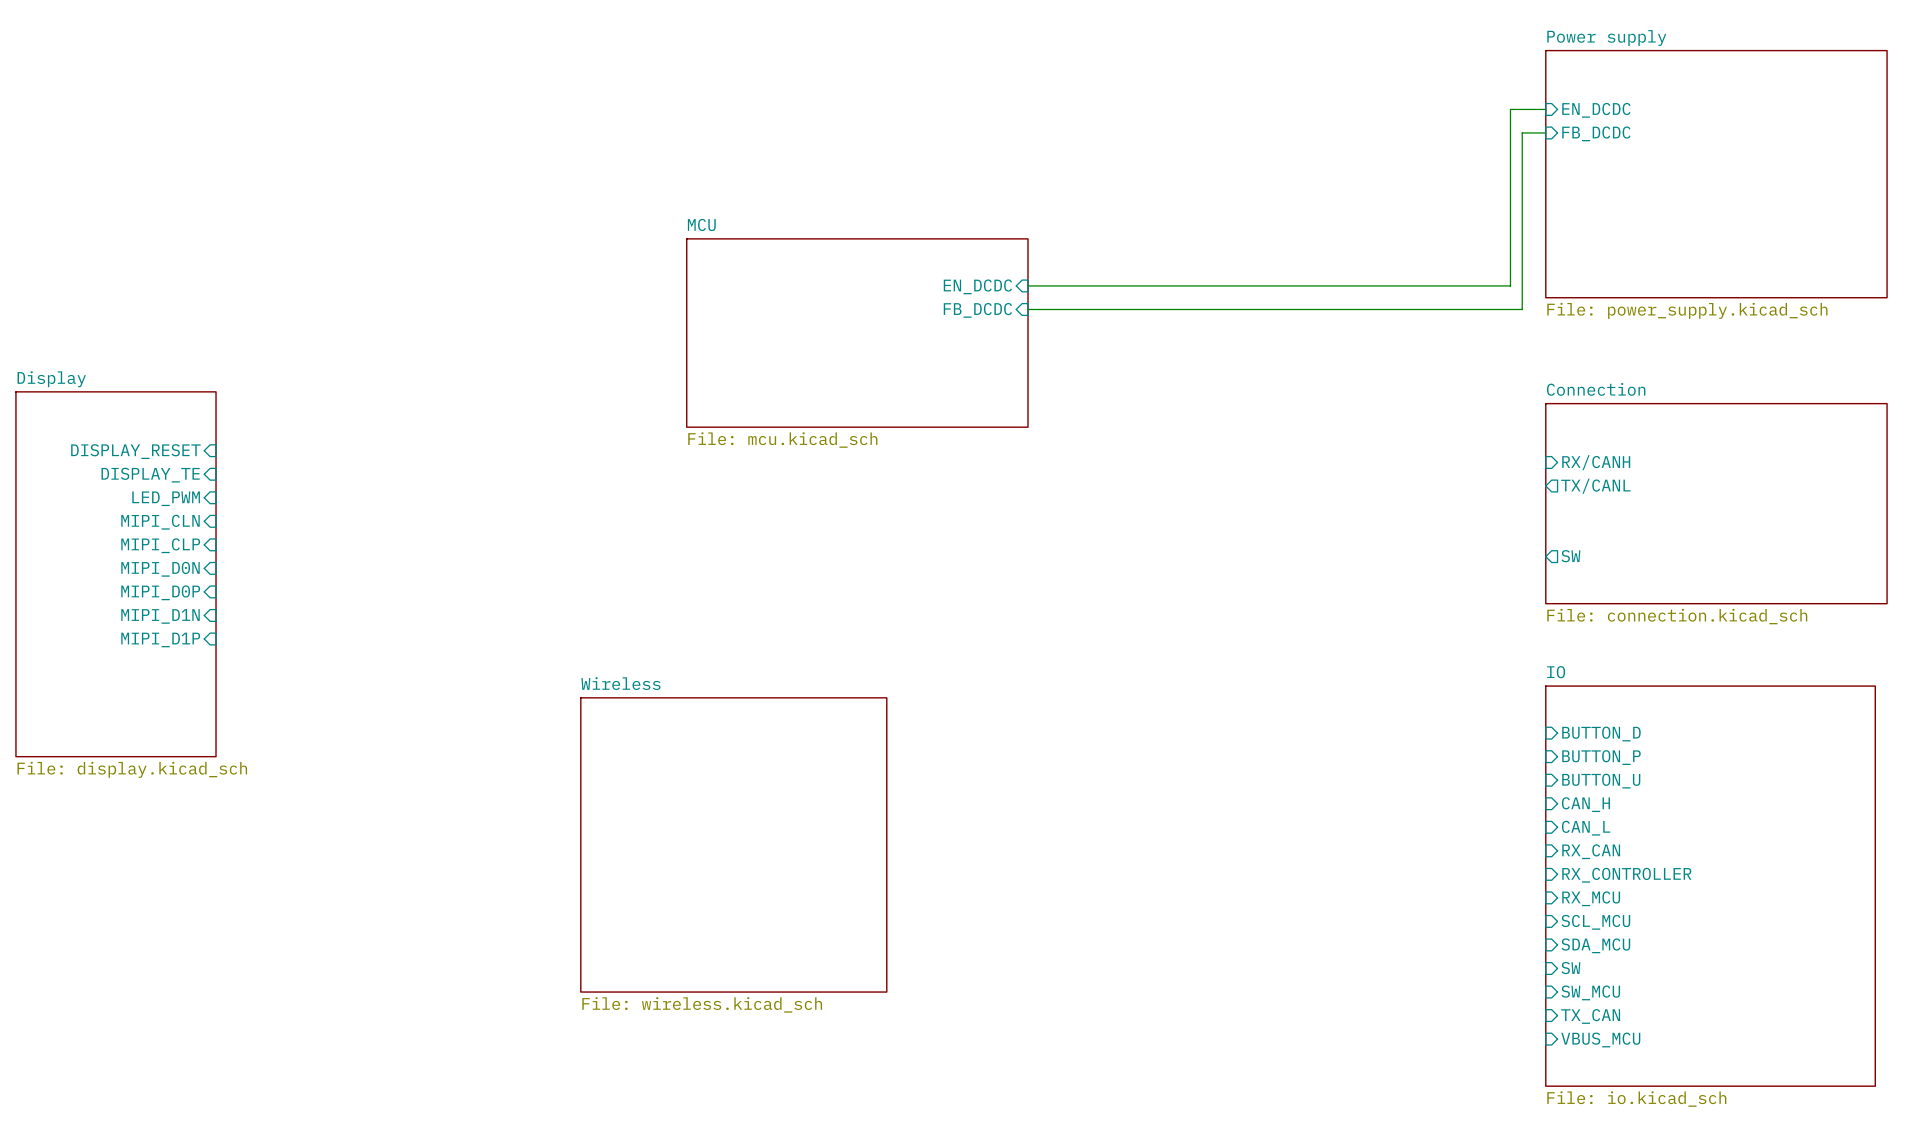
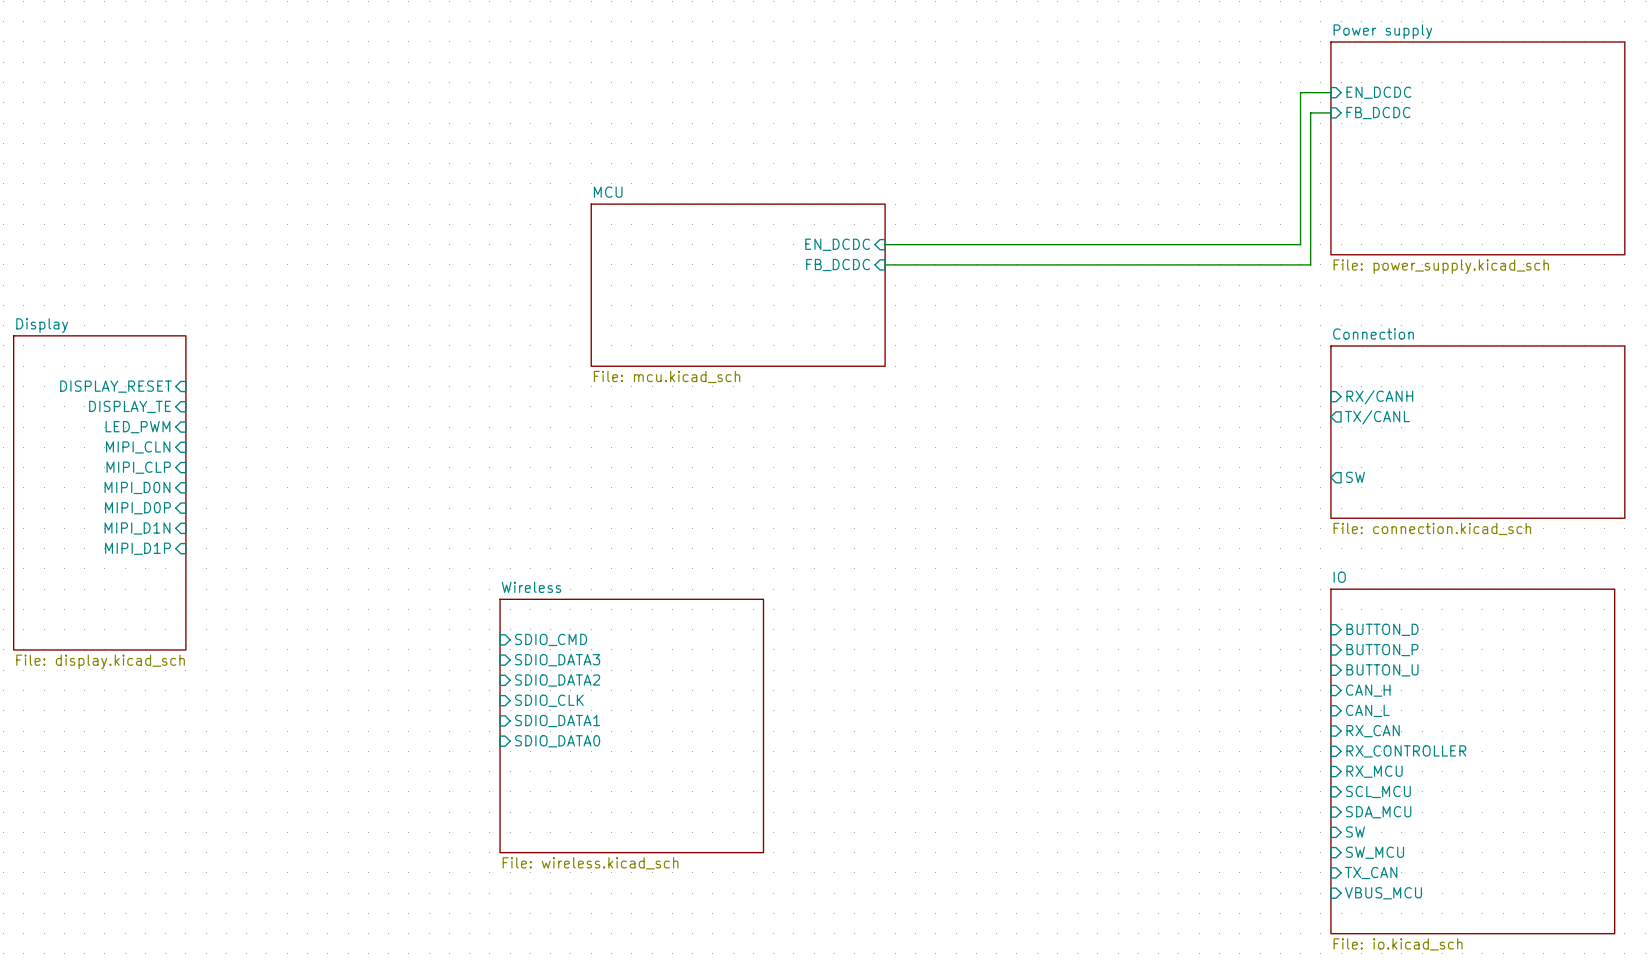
sheet pin: none -> SDIO_CMD (551, 639)
sheet pin: none -> SDIO_DATA3 (557, 660)
sheet pin: none -> SDIO_DATA2 (557, 680)
sheet pin: none -> SDIO_CLK (549, 700)
sheet pin: none -> SDIO_DATA1 (557, 721)
sheet pin: none -> SDIO_DATA0 (557, 741)

